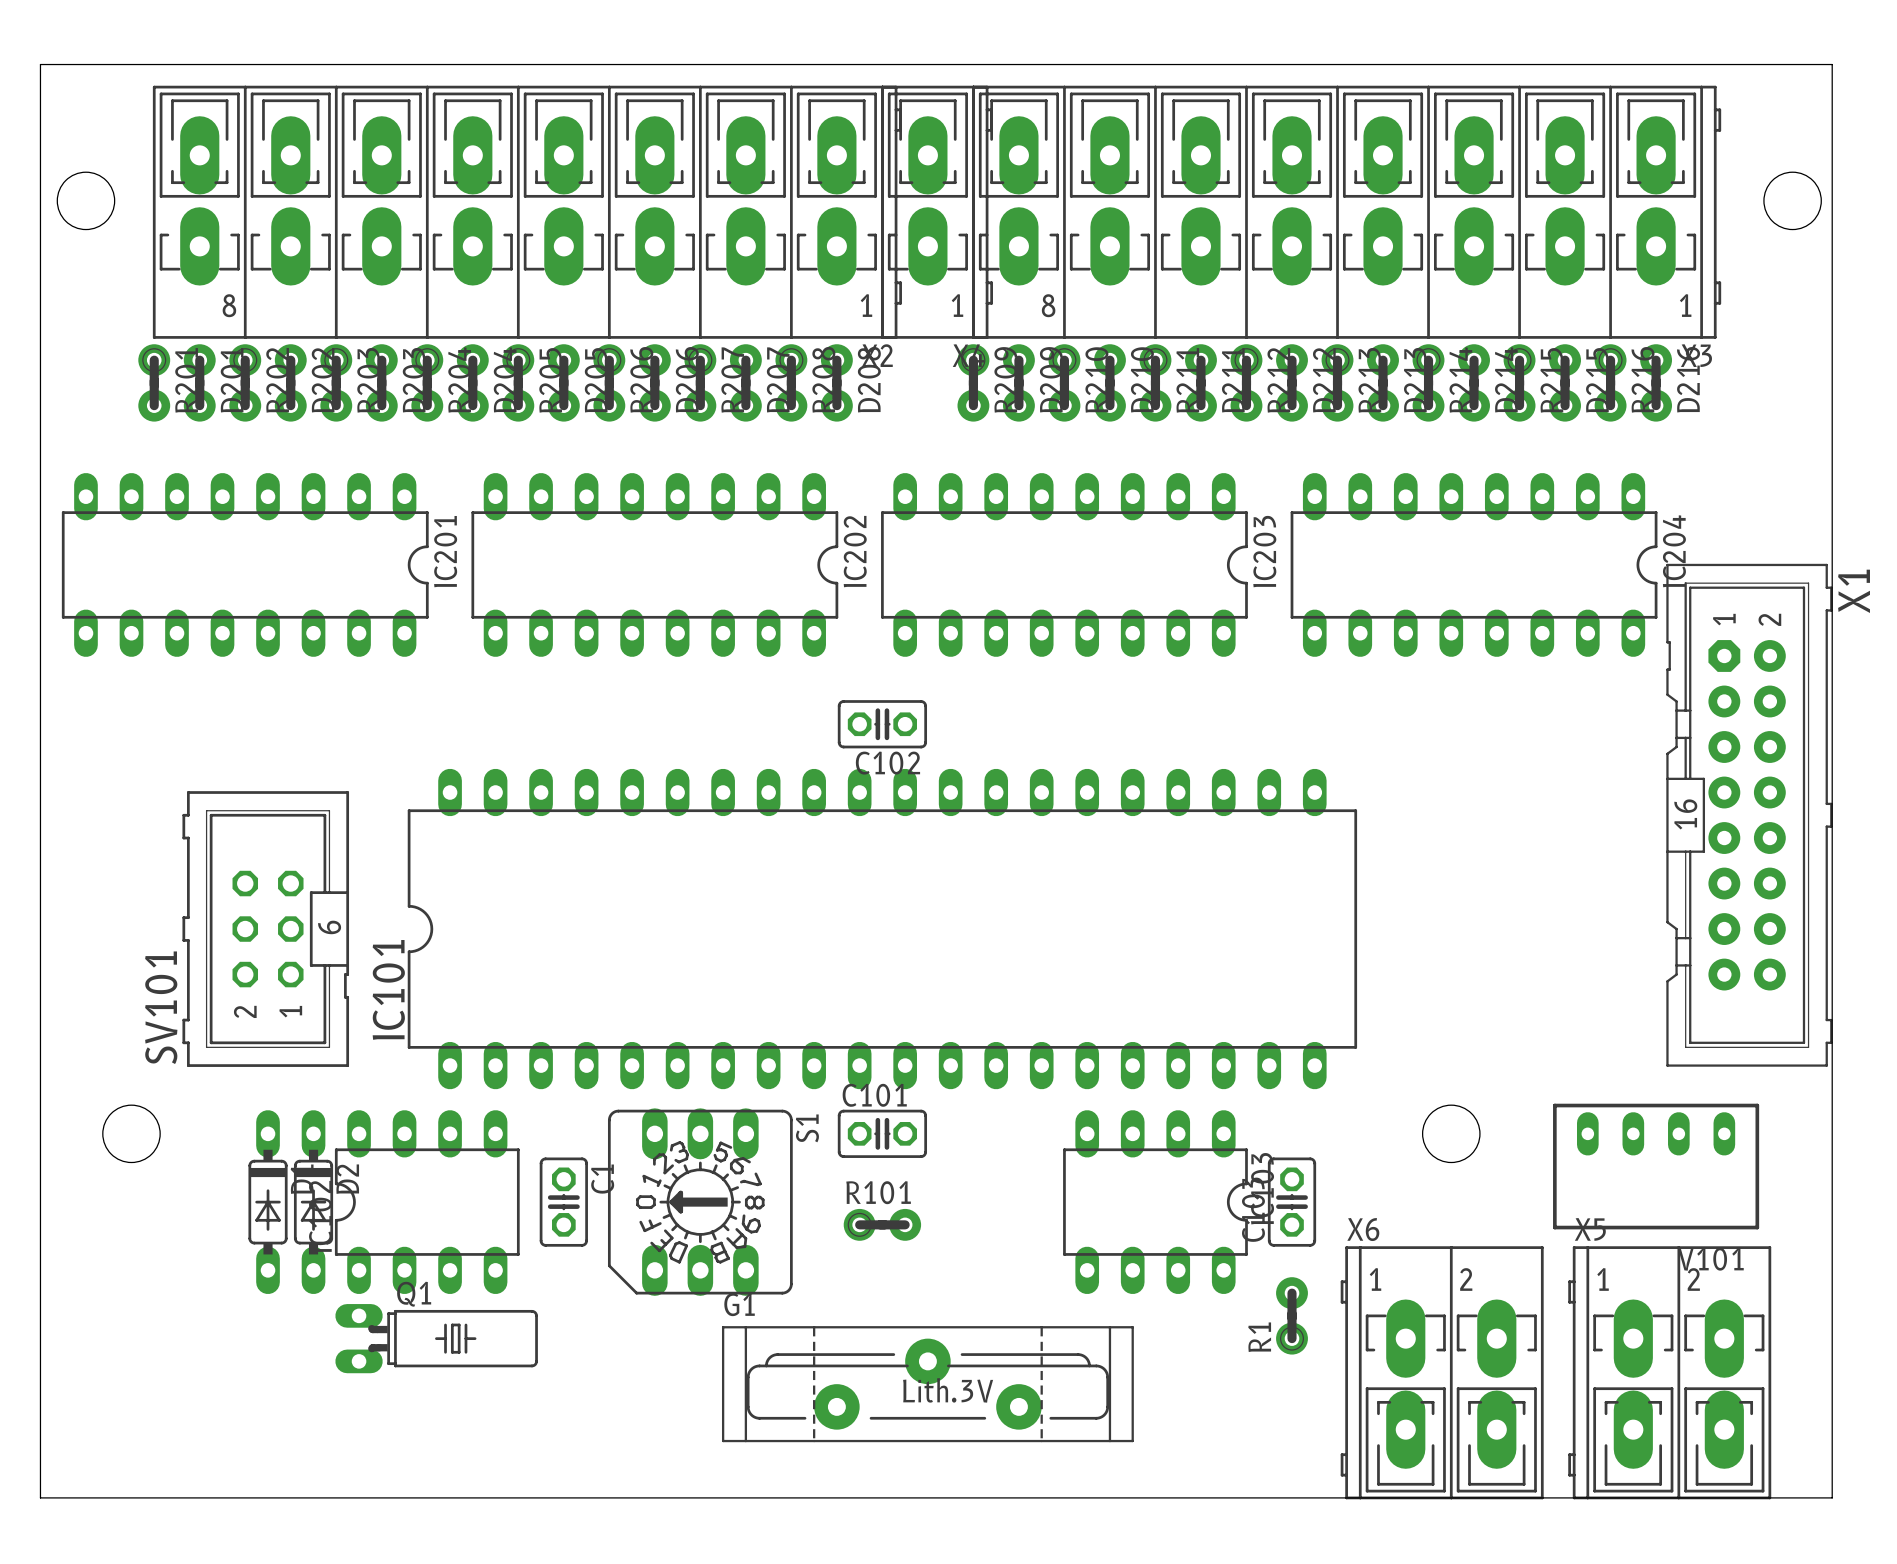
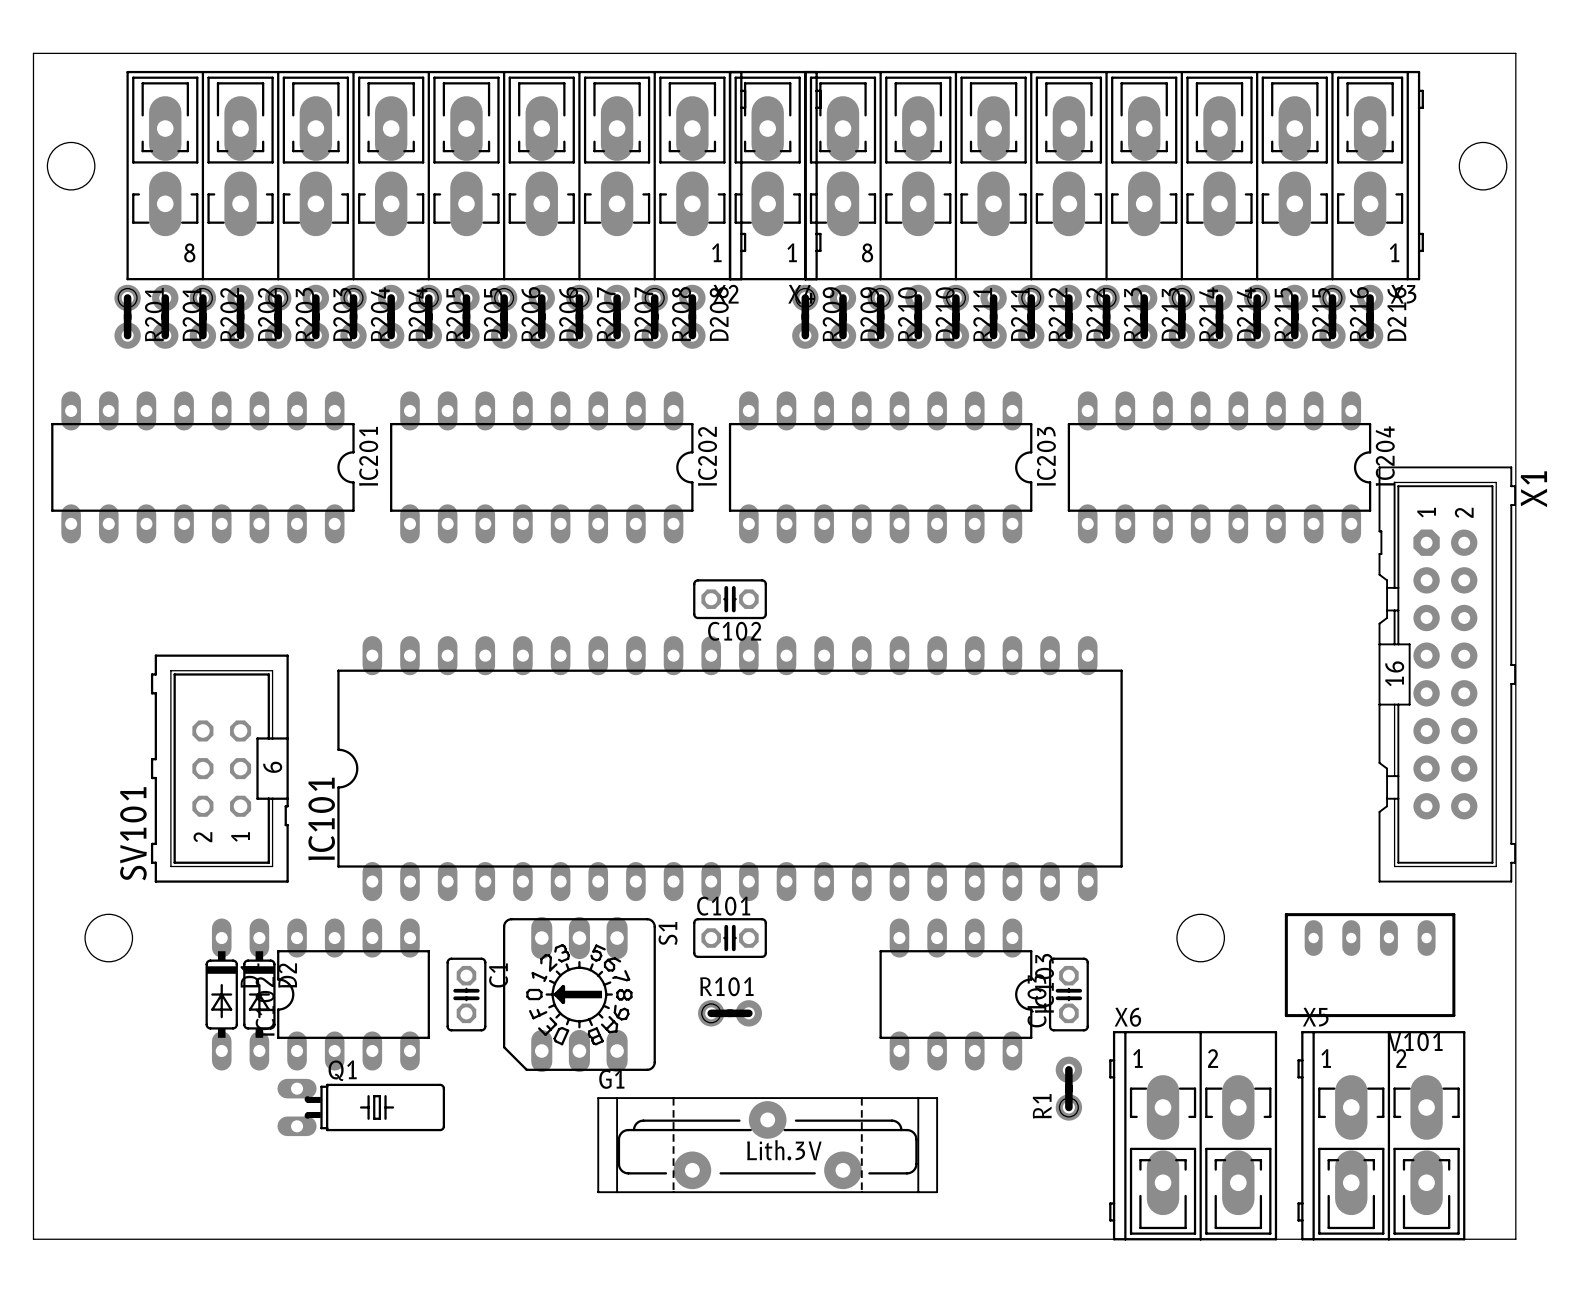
G1 footprint: [721, 1326, 1134, 1443] -> [597, 1097, 939, 1194]

